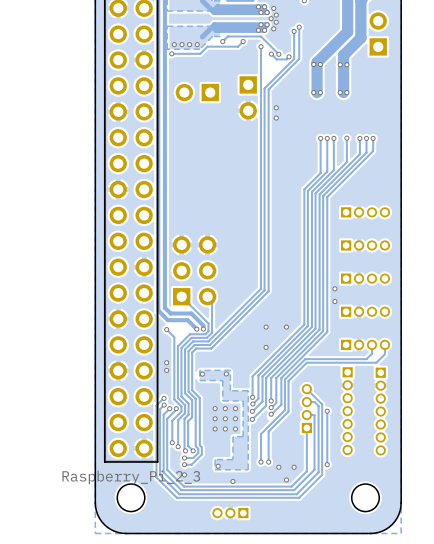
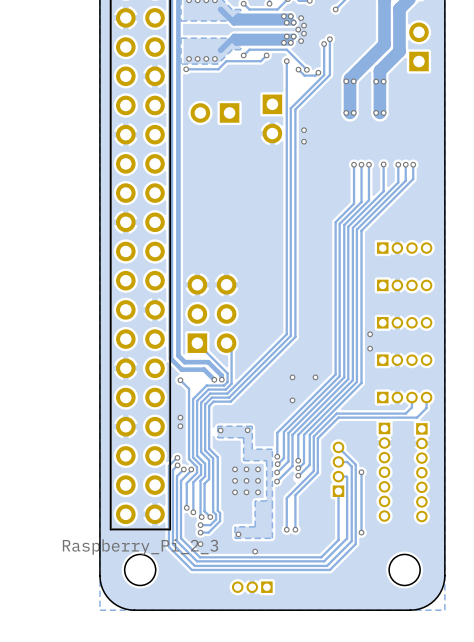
via: (278, 467) -> none
via: (294, 467) -> none
via: (286, 479) -> none

